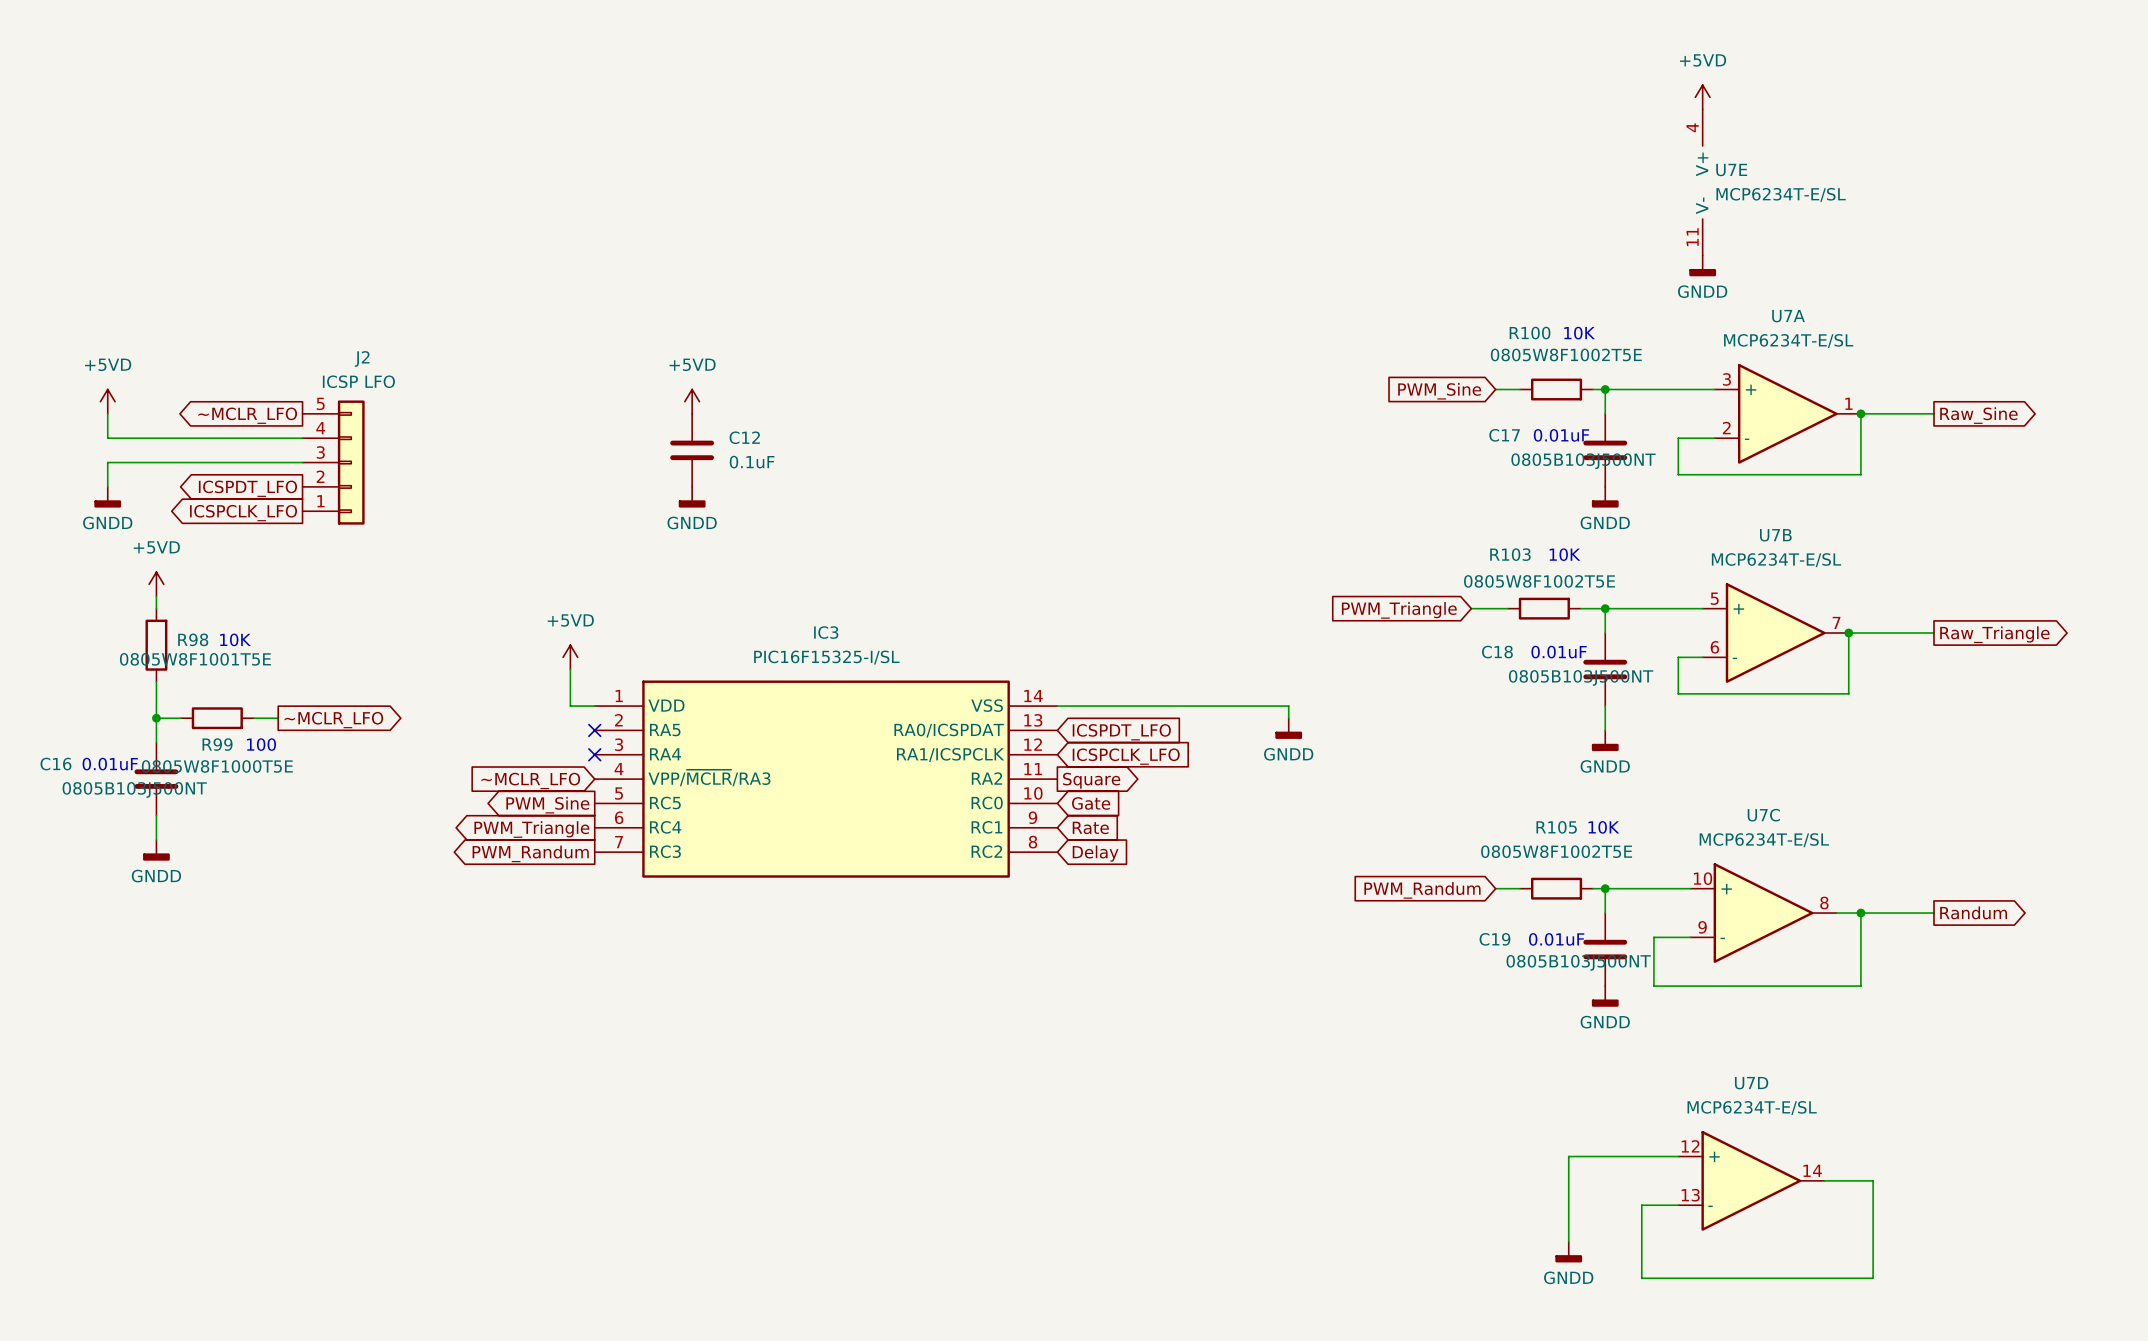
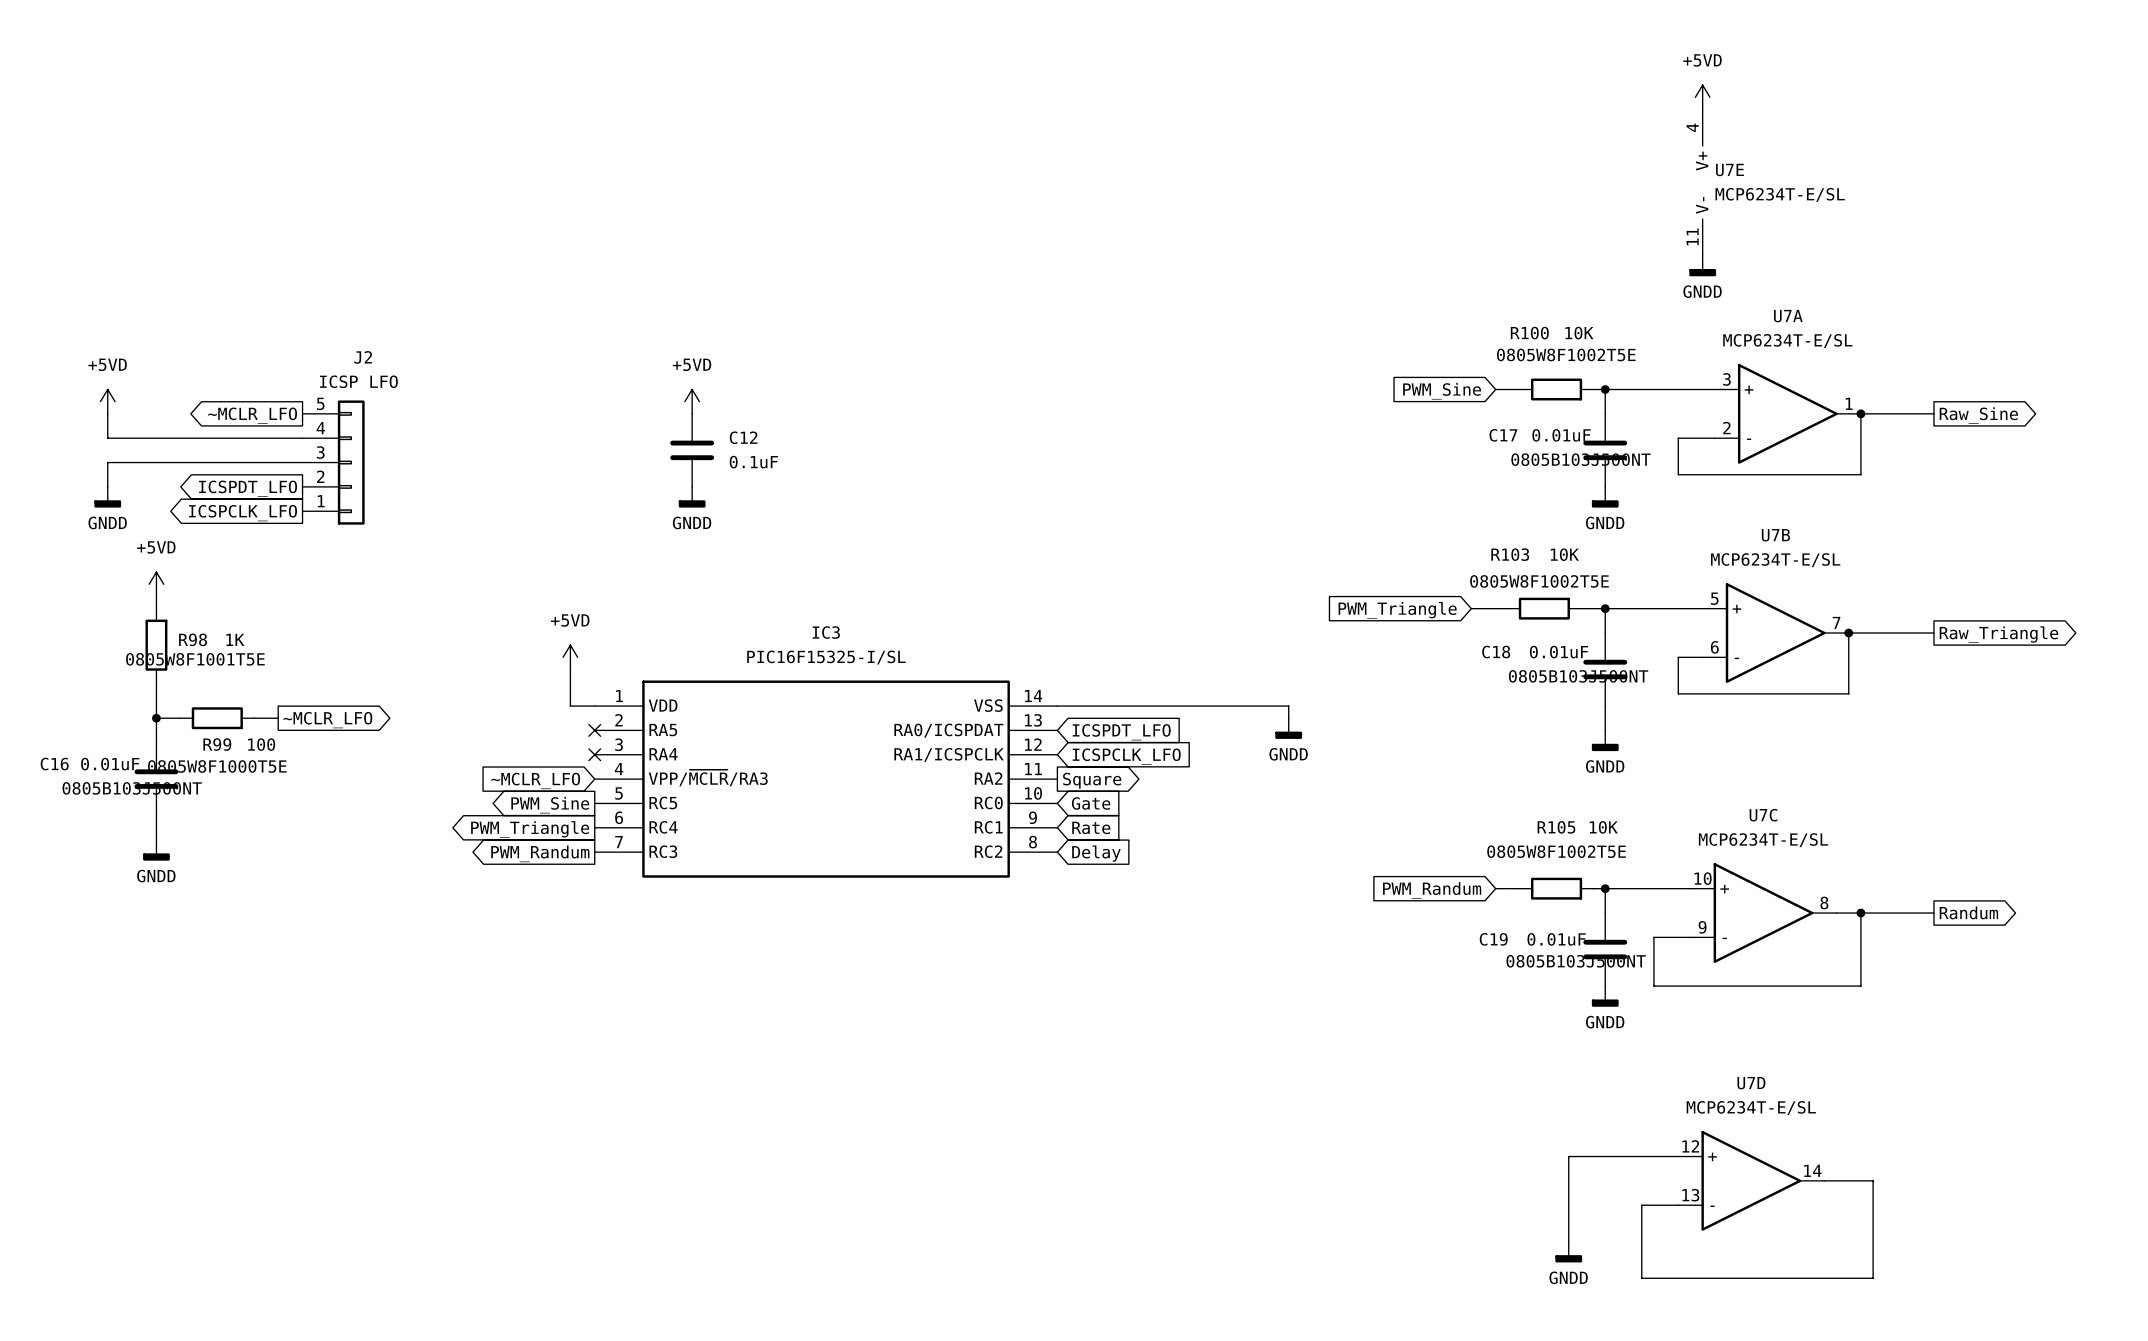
text: 10K (235, 639) -> 1K (235, 639)

